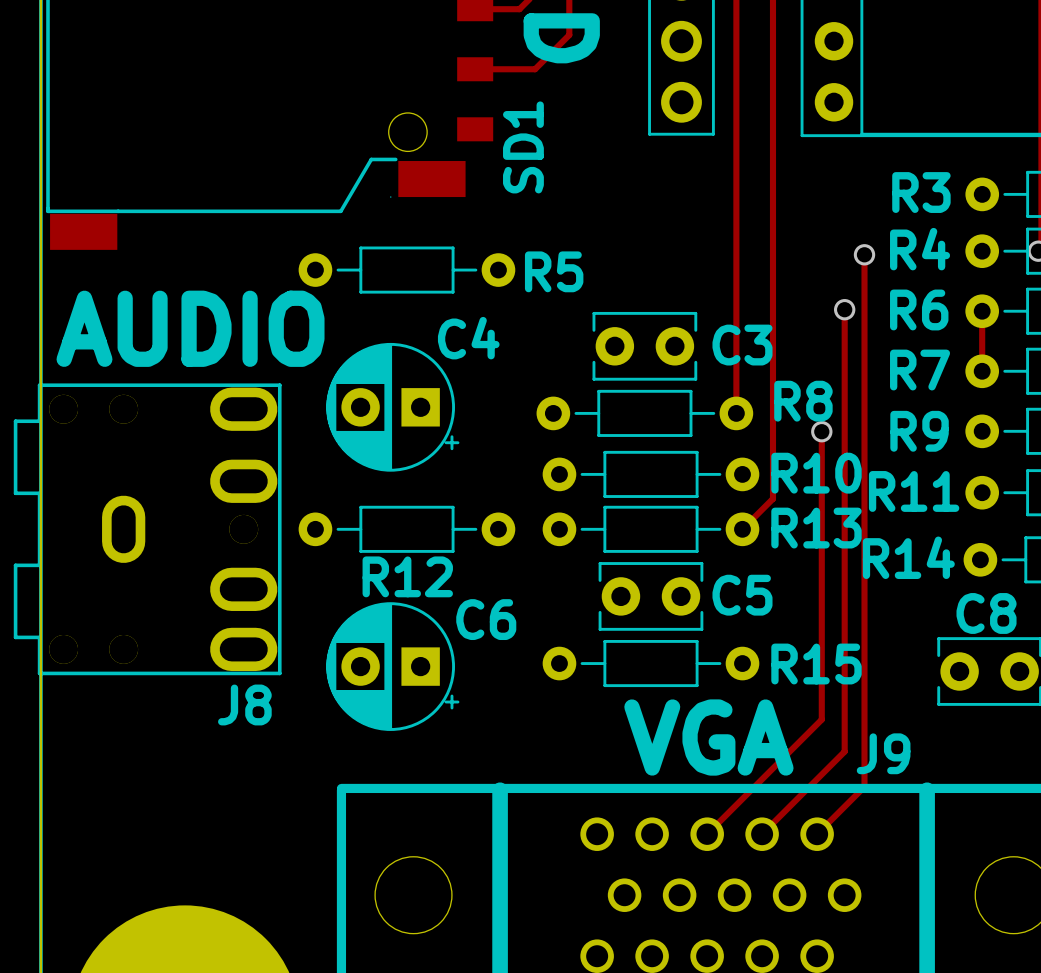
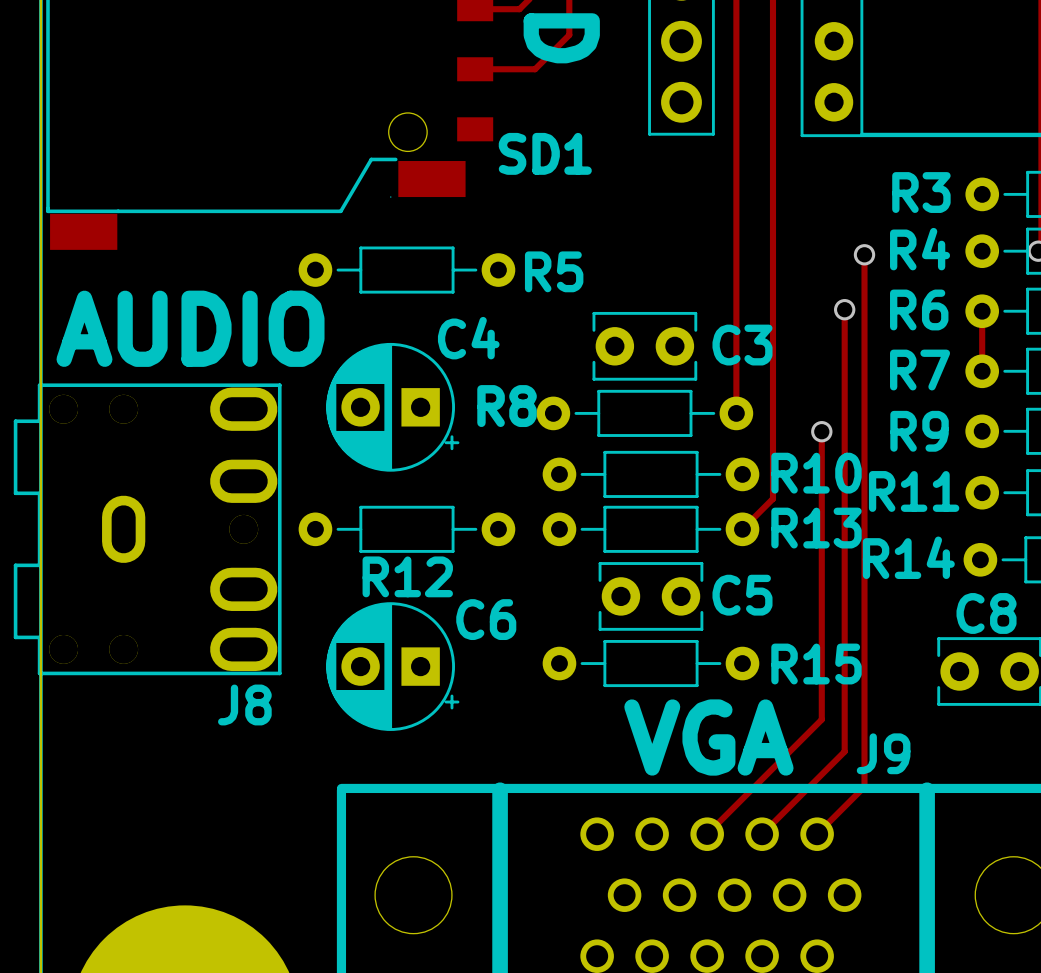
SD1 name rotation: 0° (523, 147) -> 90° clockwise (545, 153)
R8 name position: R8 (803, 401) -> R8 (507, 406)

